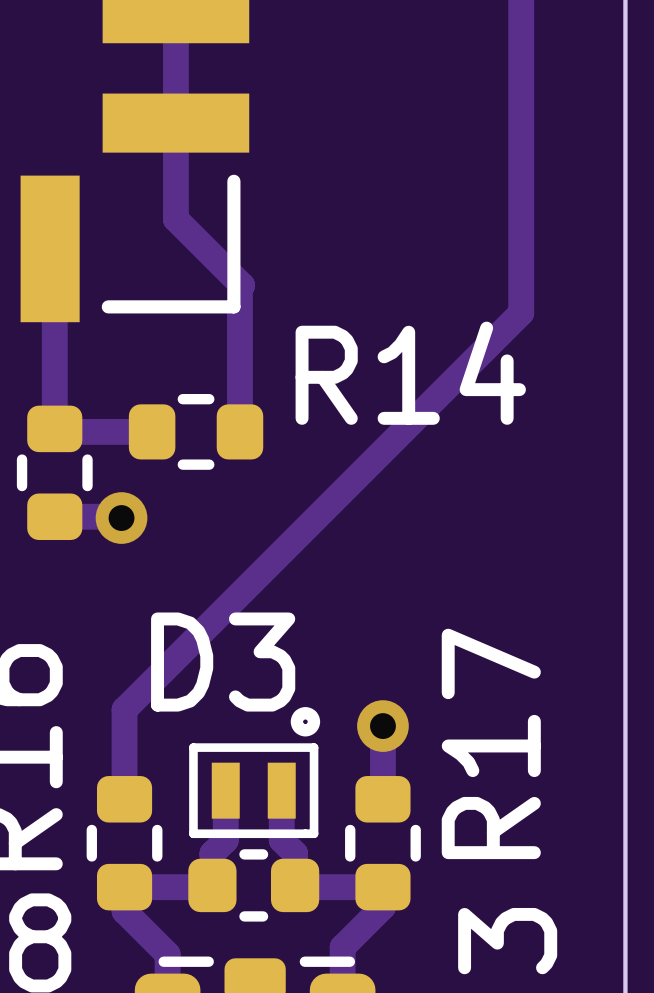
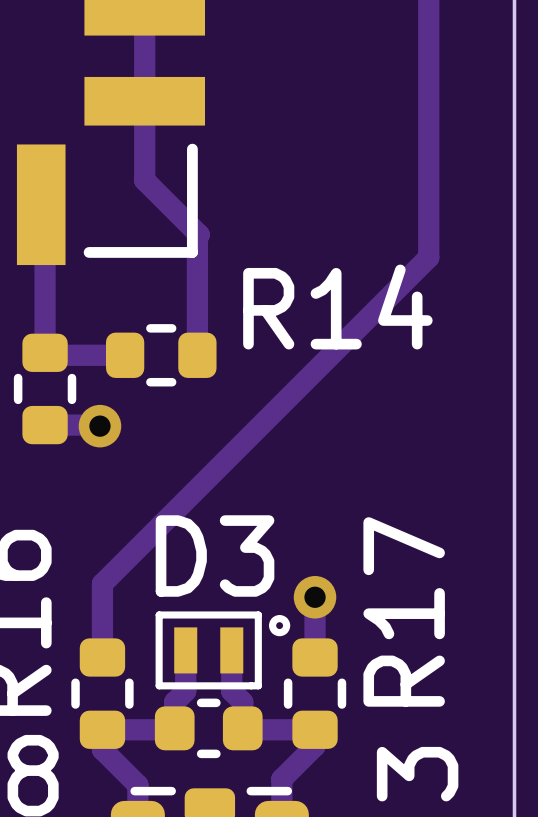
D3 name position: D3 (223, 662) -> D3 (215, 556)
D3 footprint: [189, 707, 321, 839] -> [155, 611, 291, 690]

